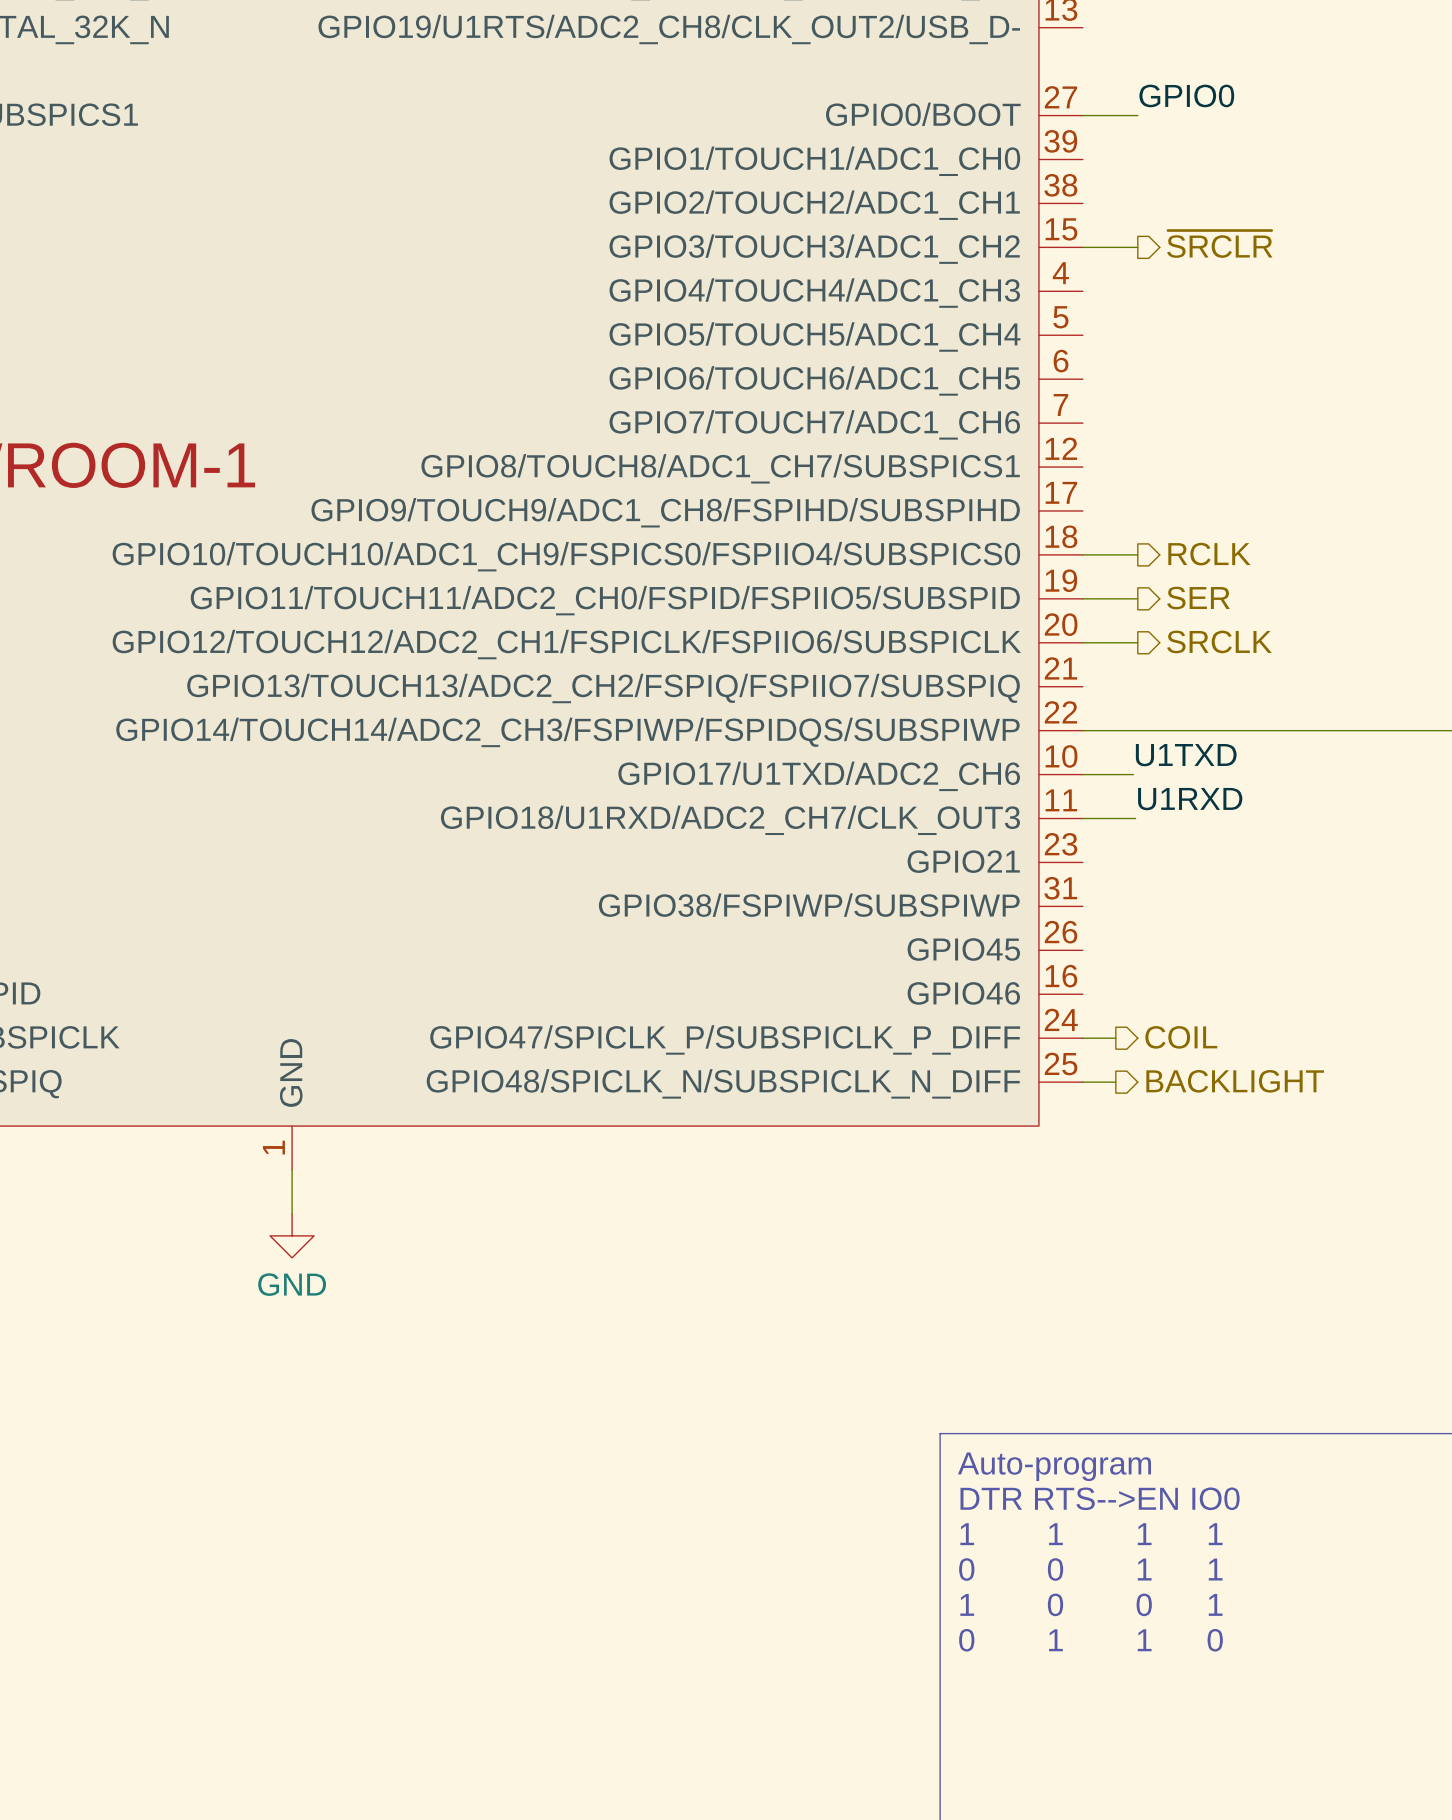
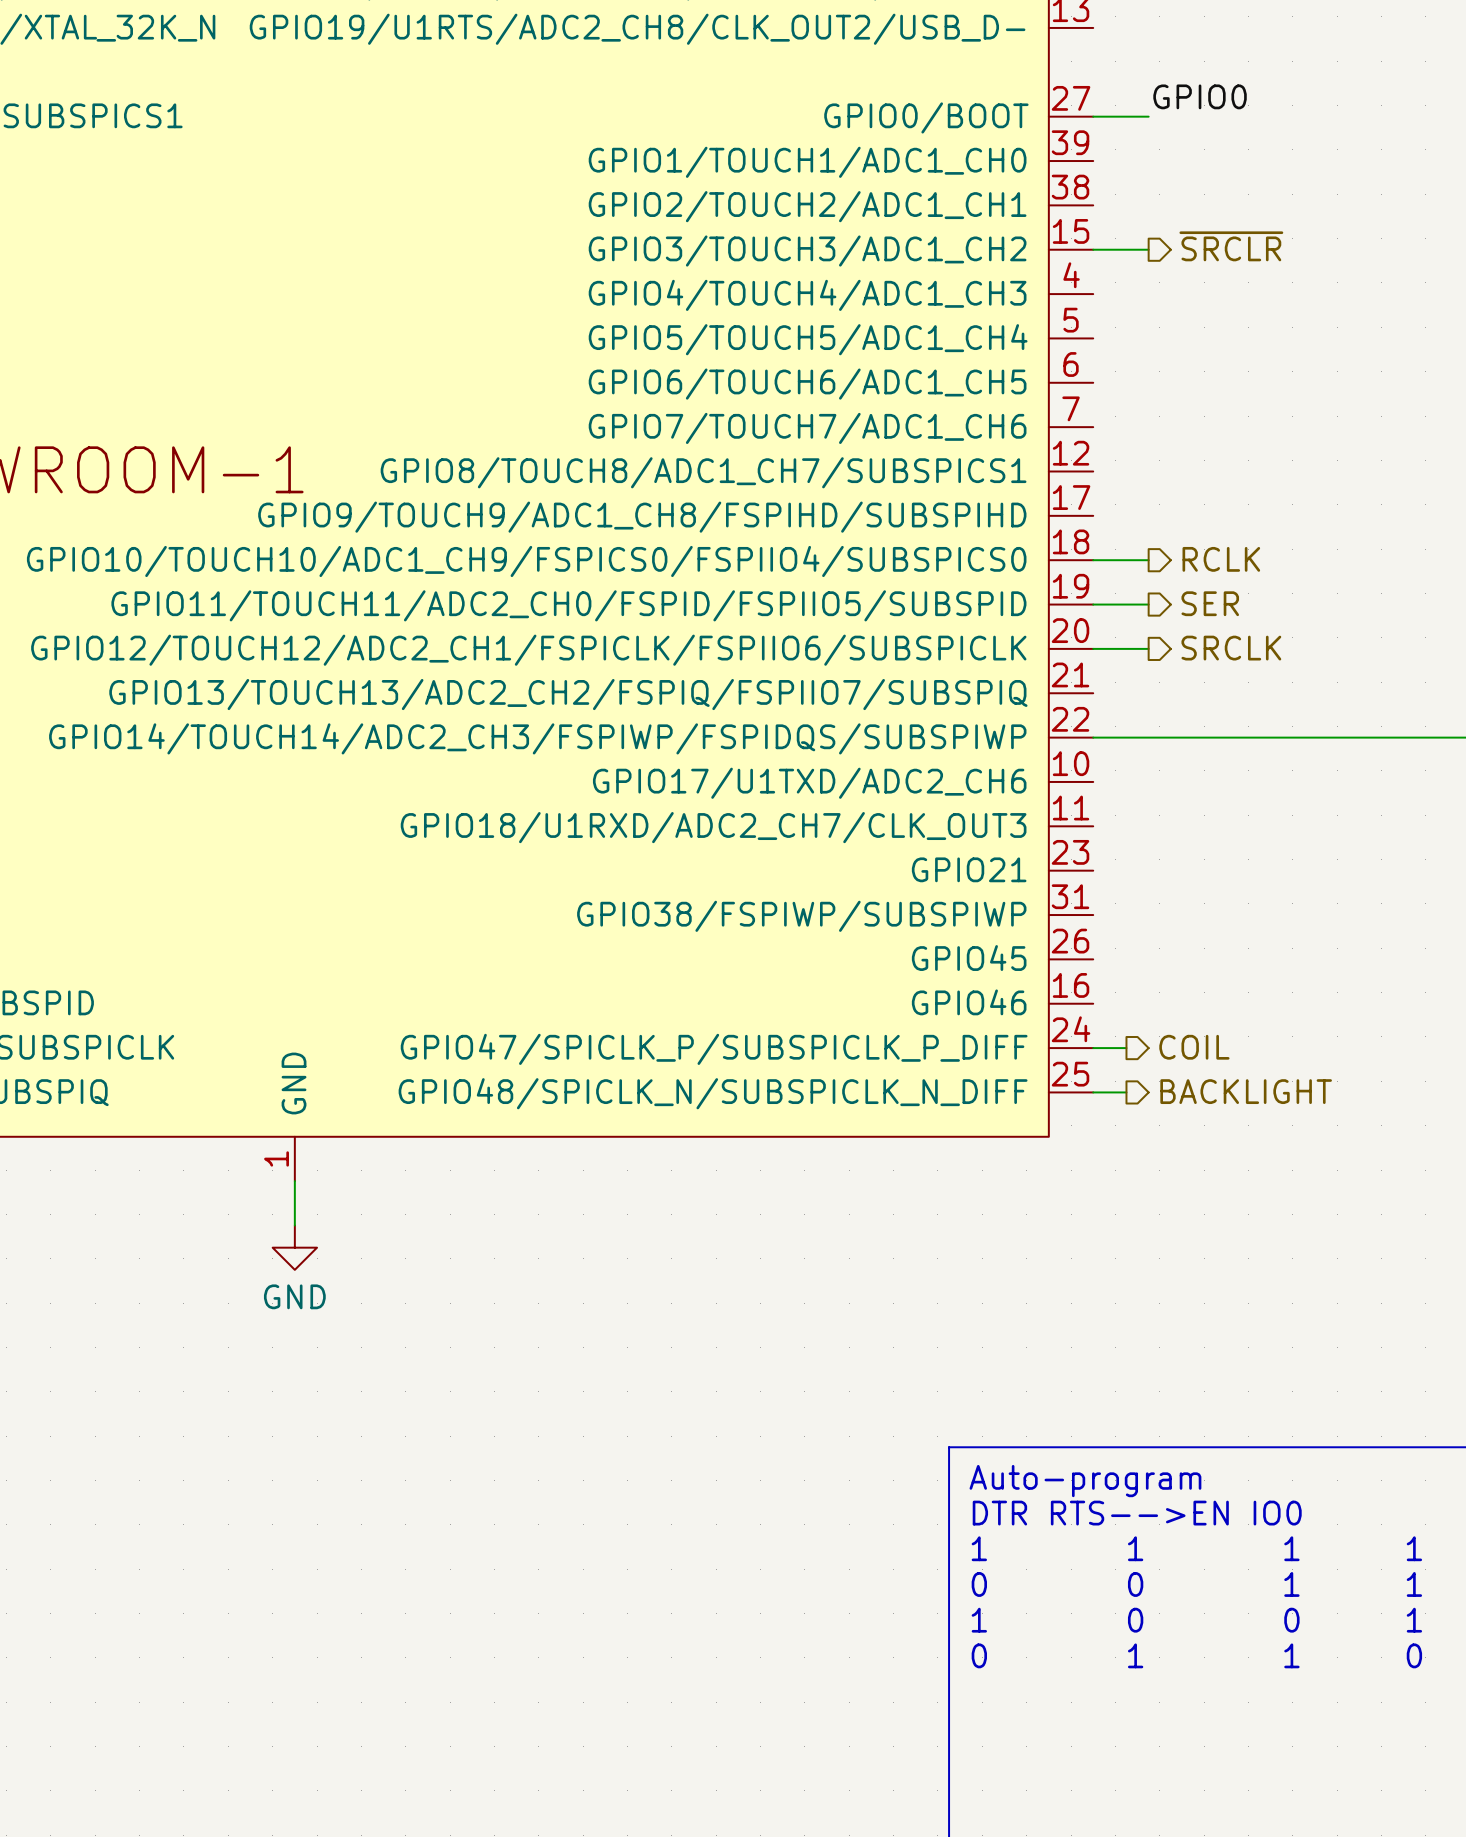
label: U1TXD (1186, 755) -> none
wire: (1082, 774) (1133, 774) -> none
label: U1RXD (1190, 799) -> none
wire: (1082, 818) (1135, 818) -> none

